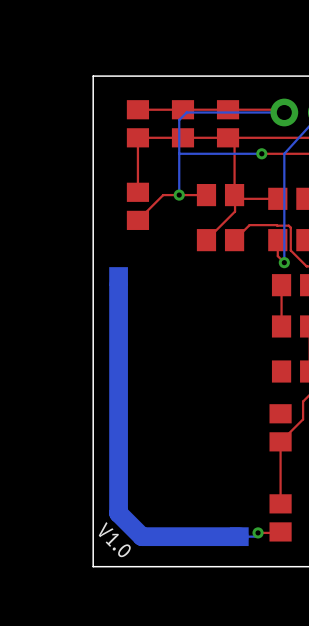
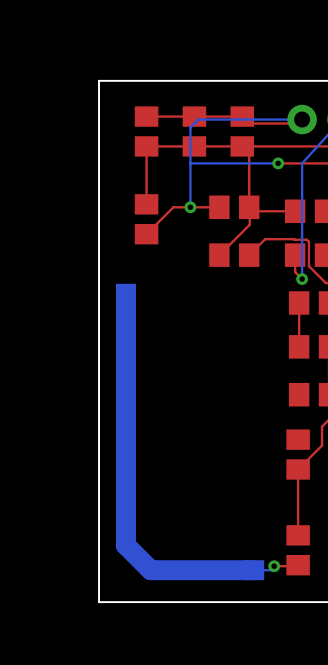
top track: (228, 109) (281, 109) (284, 112) -> none
top track: none -> (302, 123) (249, 123)
text: V1.0 (114, 539) -> none

